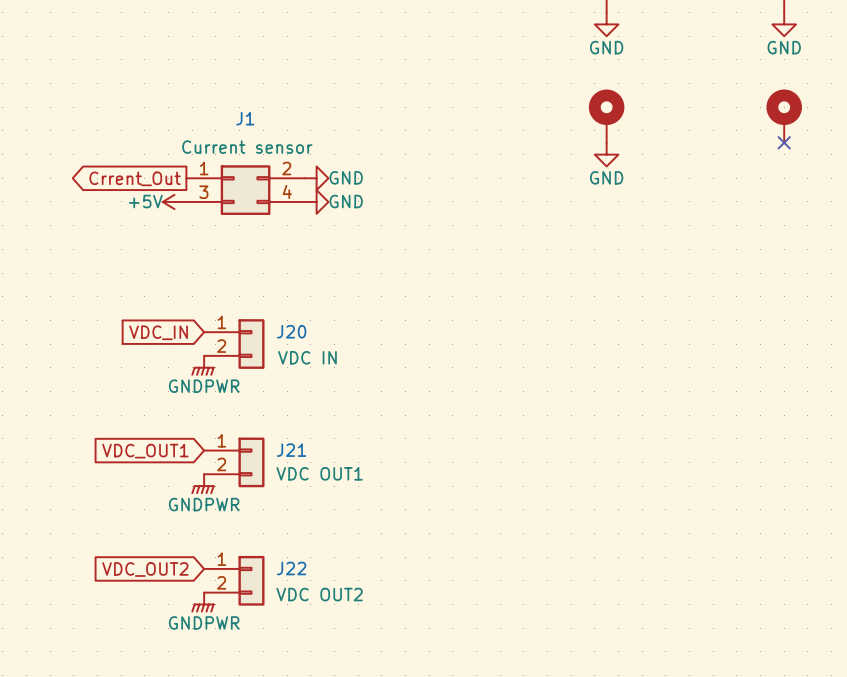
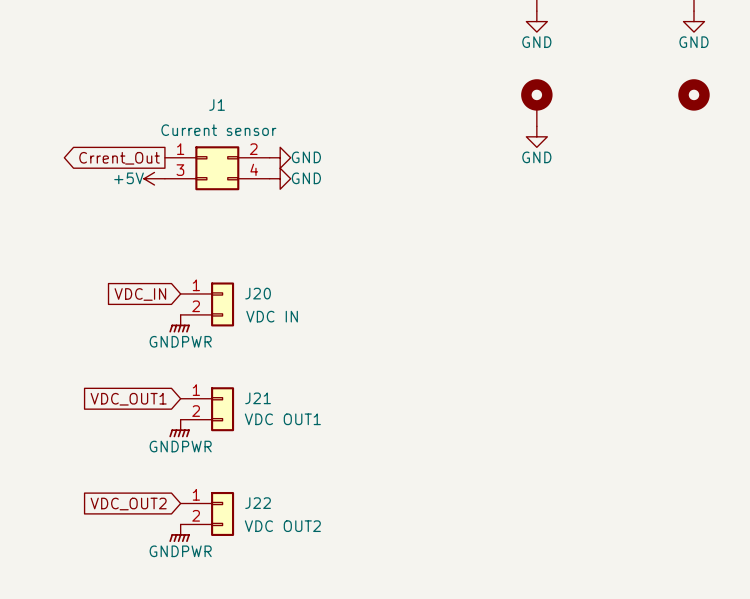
part symbol: [766, 89, 802, 143] -> [678, 79, 710, 111]
no-connect mark: (784, 142) -> none

